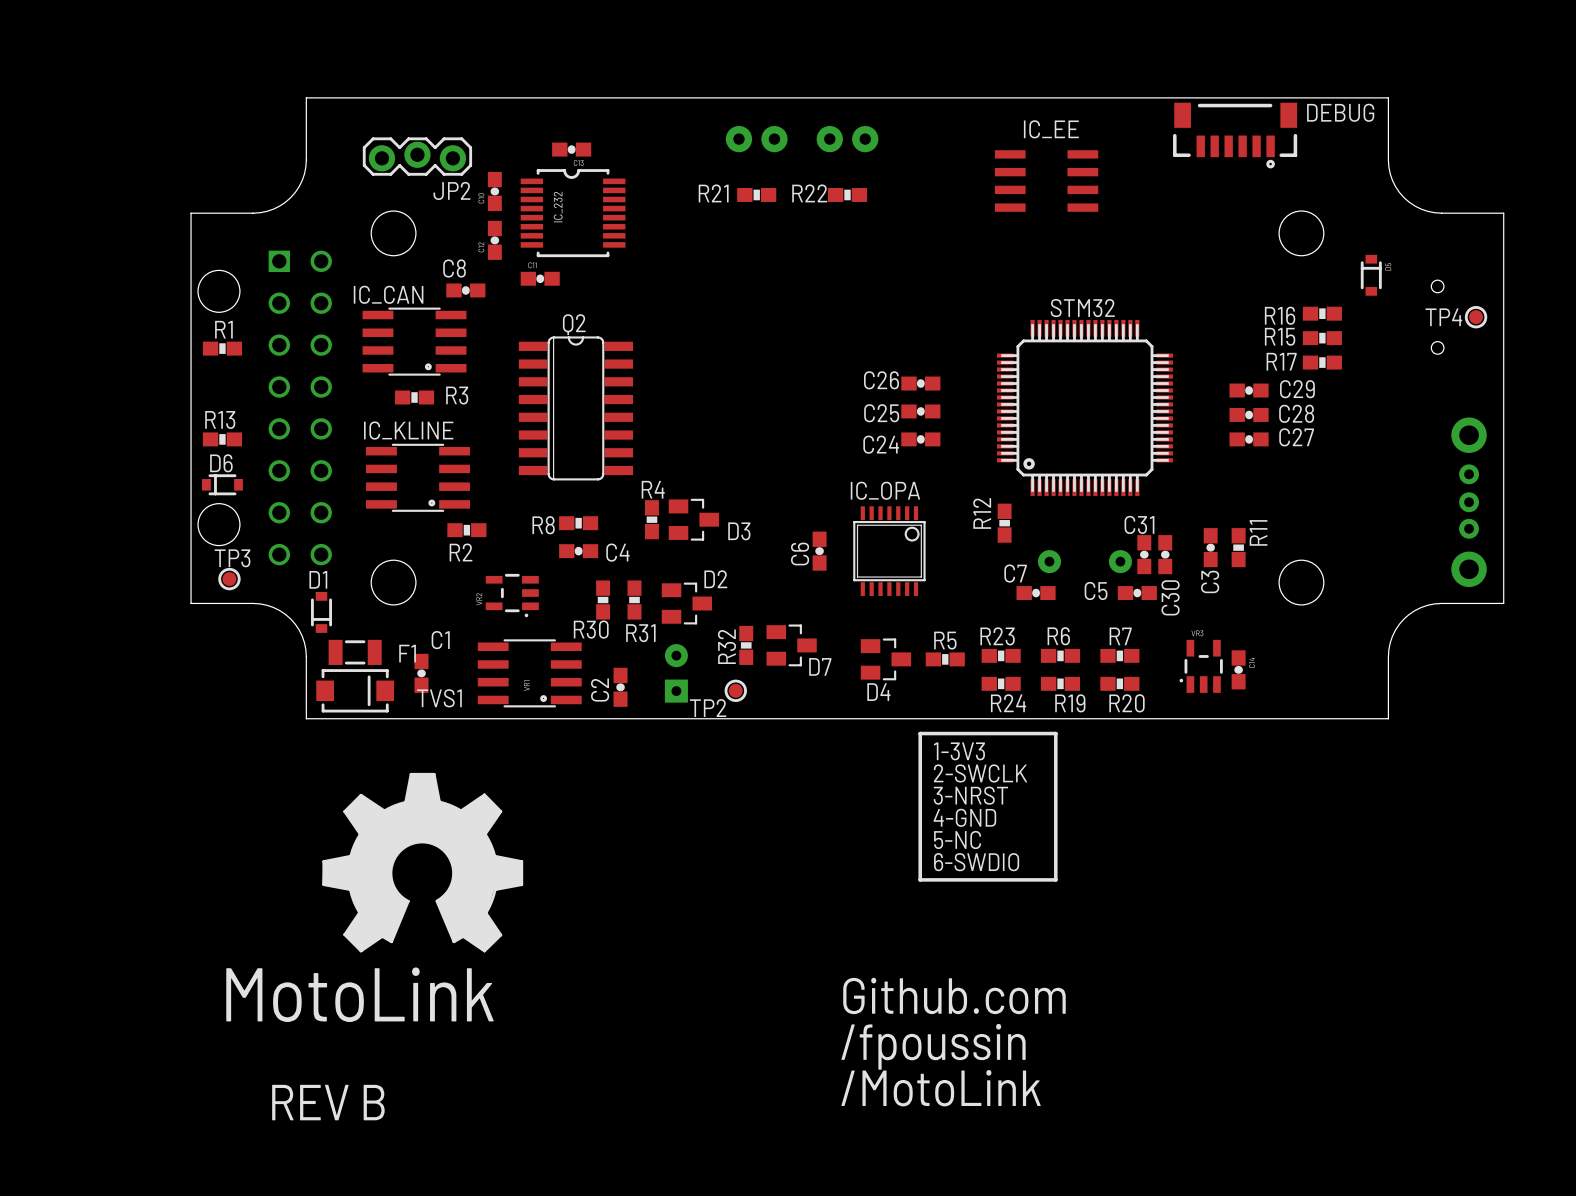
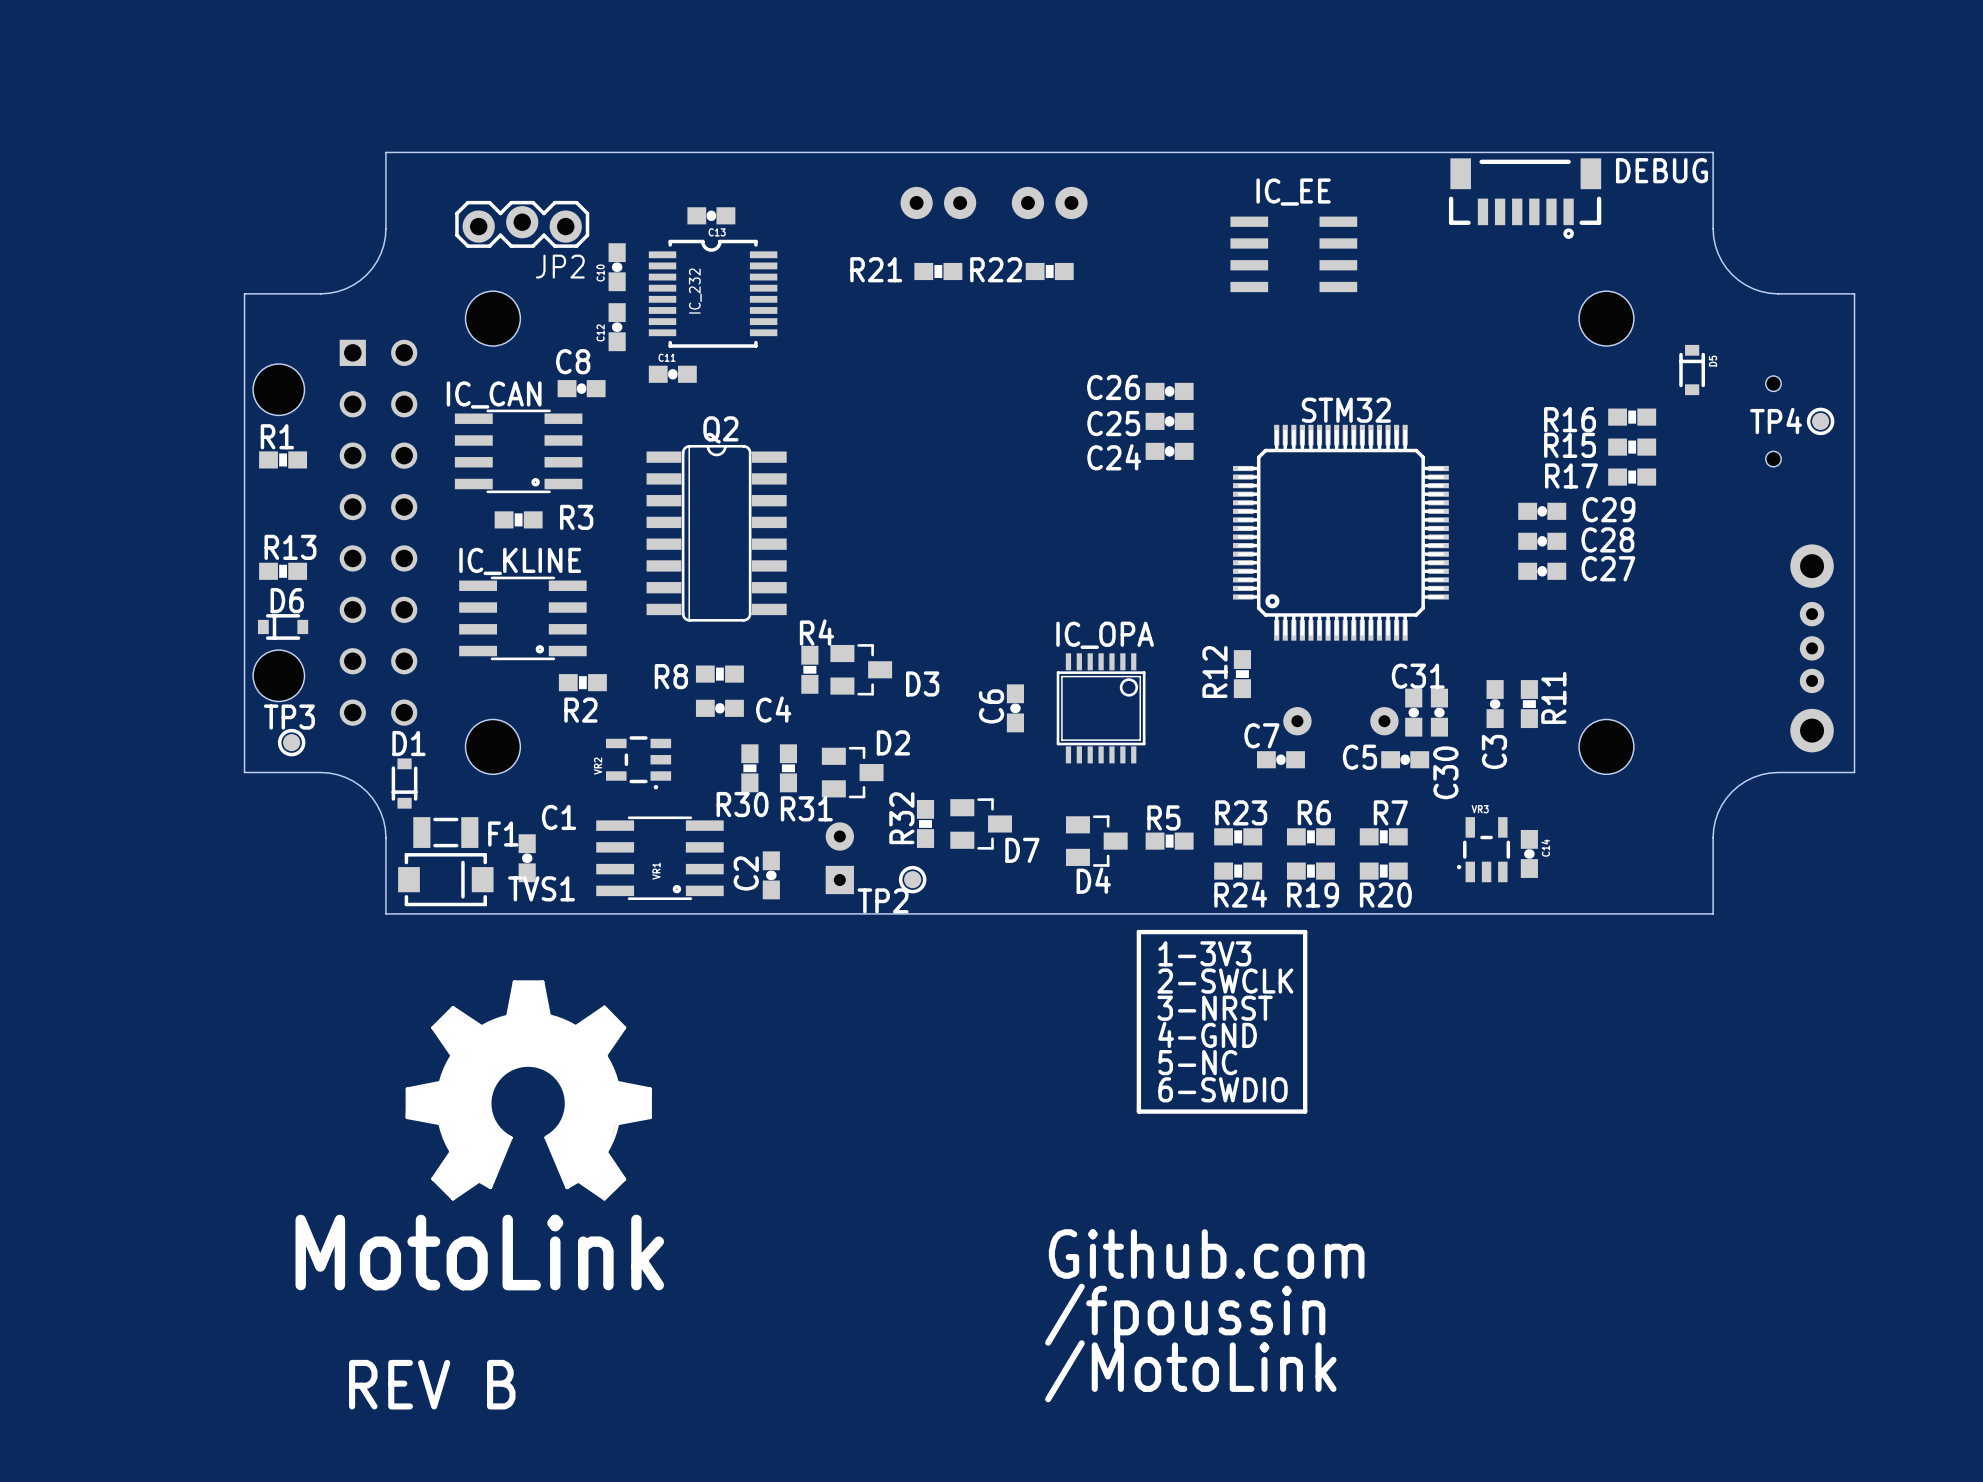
C26 position: (920, 383) -> (1169, 391)
C25 position: (920, 411) -> (1169, 421)
C24 position: (920, 439) -> (1169, 451)

